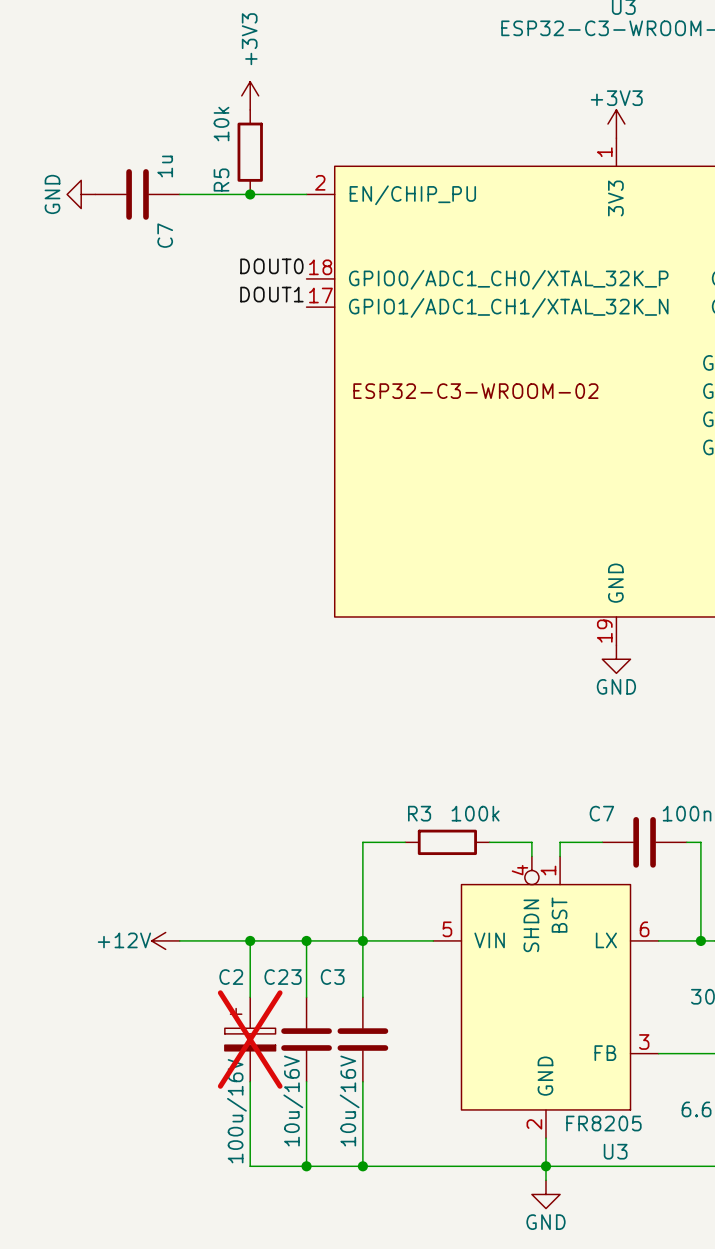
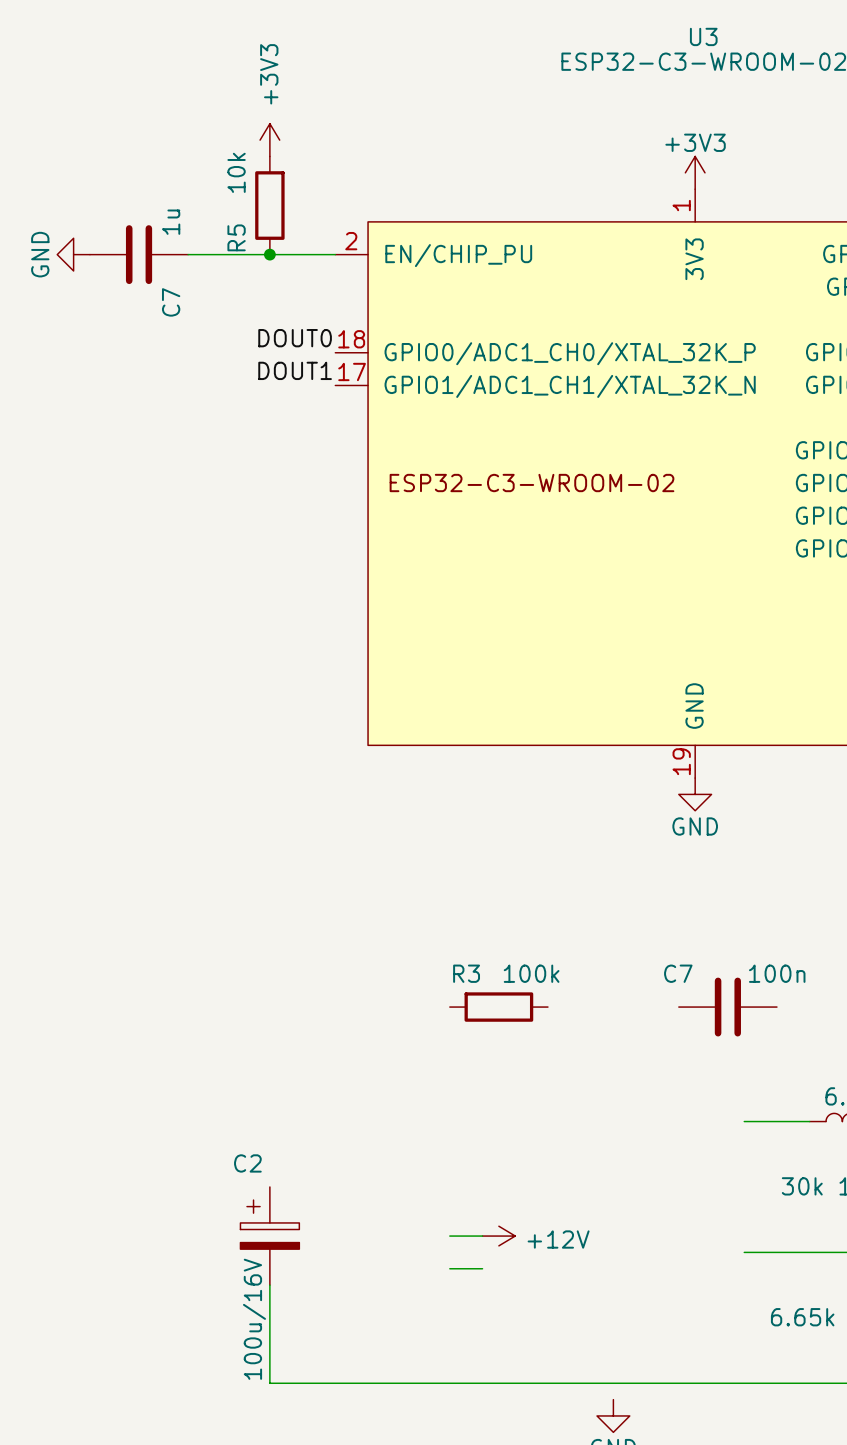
wire: (405, 842) (362, 842) (362, 997) -> none
wire: (489, 842) (531, 842) (531, 856) -> none
wire: (602, 842) (560, 842) (560, 856) -> none
wire: (686, 842) (700, 842) (700, 940) -> none
power symbol: +12V (165, 940) -> none
wire: (179, 940) (433, 940) -> none
wire: (250, 940) (250, 997) -> none
junction: (250, 940) -> none
wire: (306, 940) (306, 997) -> none
junction: (306, 940) -> none
junction: (362, 940) -> none
junction: (700, 940) -> none
U3: FR8205 (545, 997) -> none
C2 do-not-place cross: (250, 1039) -> none
C23: 10u/16V (306, 1039) -> none
C3: 10u/16V (362, 1039) -> none
wire: none -> (449, 1236) (482, 1236)
power symbol: none -> +12V (498, 1236)
wire: none -> (449, 1268) (482, 1268)
wire: (306, 1081) (306, 1166) -> none
wire: (362, 1081) (362, 1166) -> none
wire: (545, 1138) (545, 1180) -> none
junction: (306, 1166) -> none
junction: (362, 1166) -> none
junction: (545, 1166) -> none

